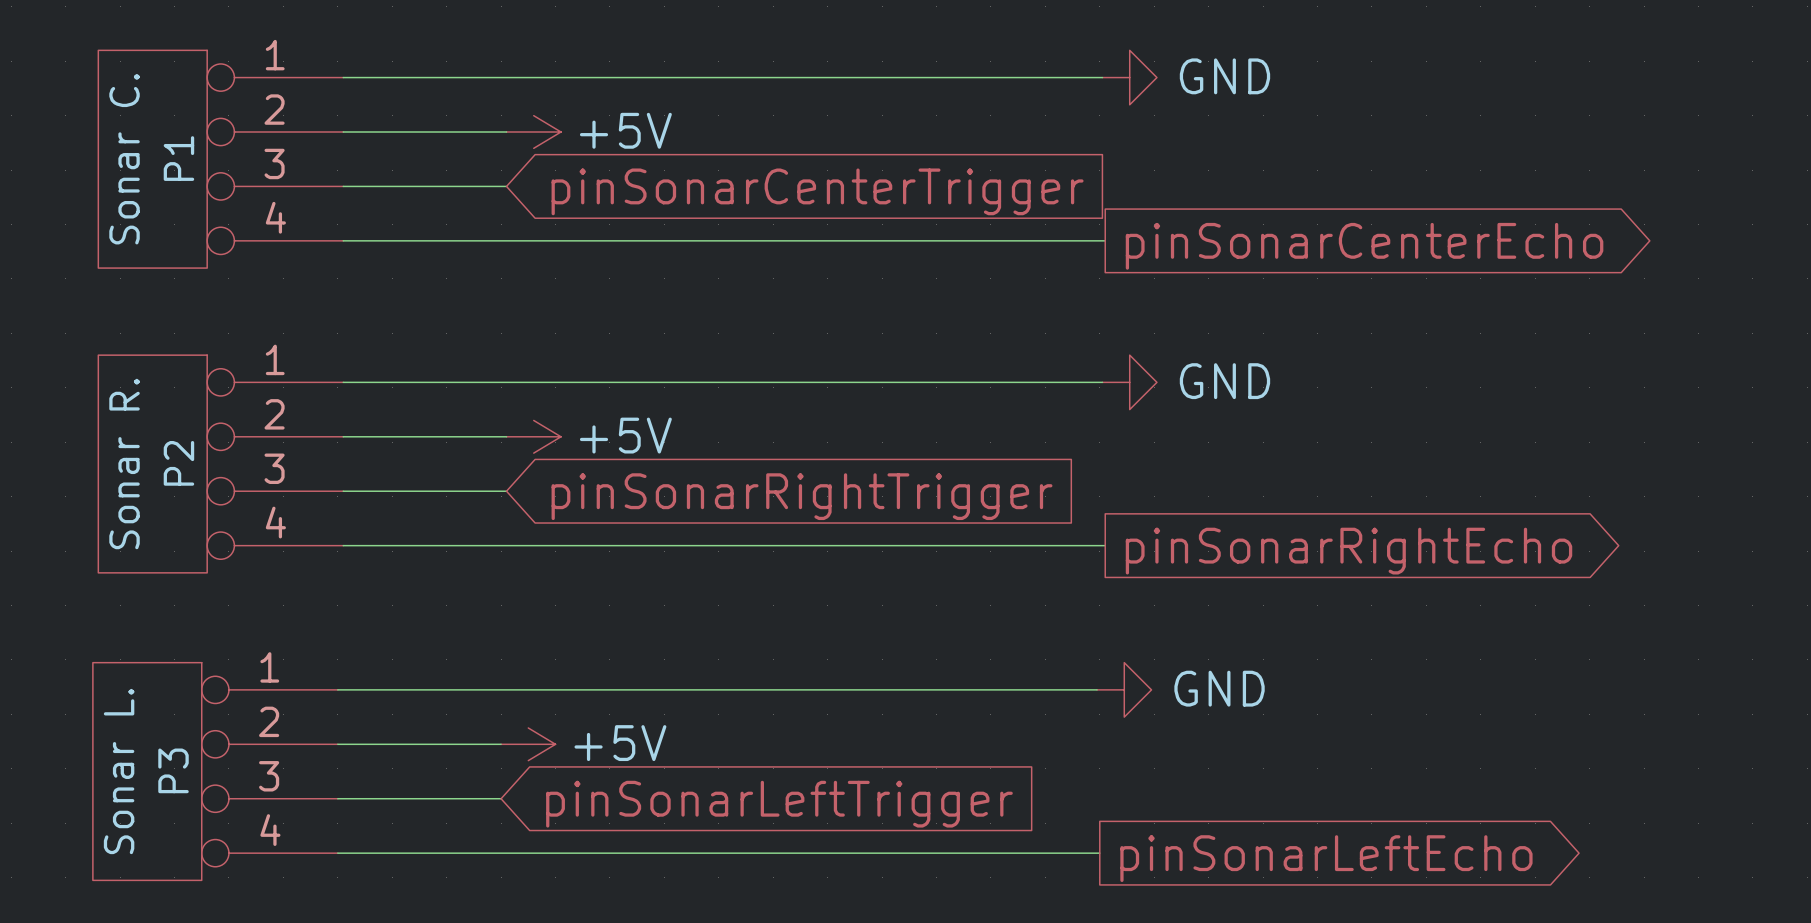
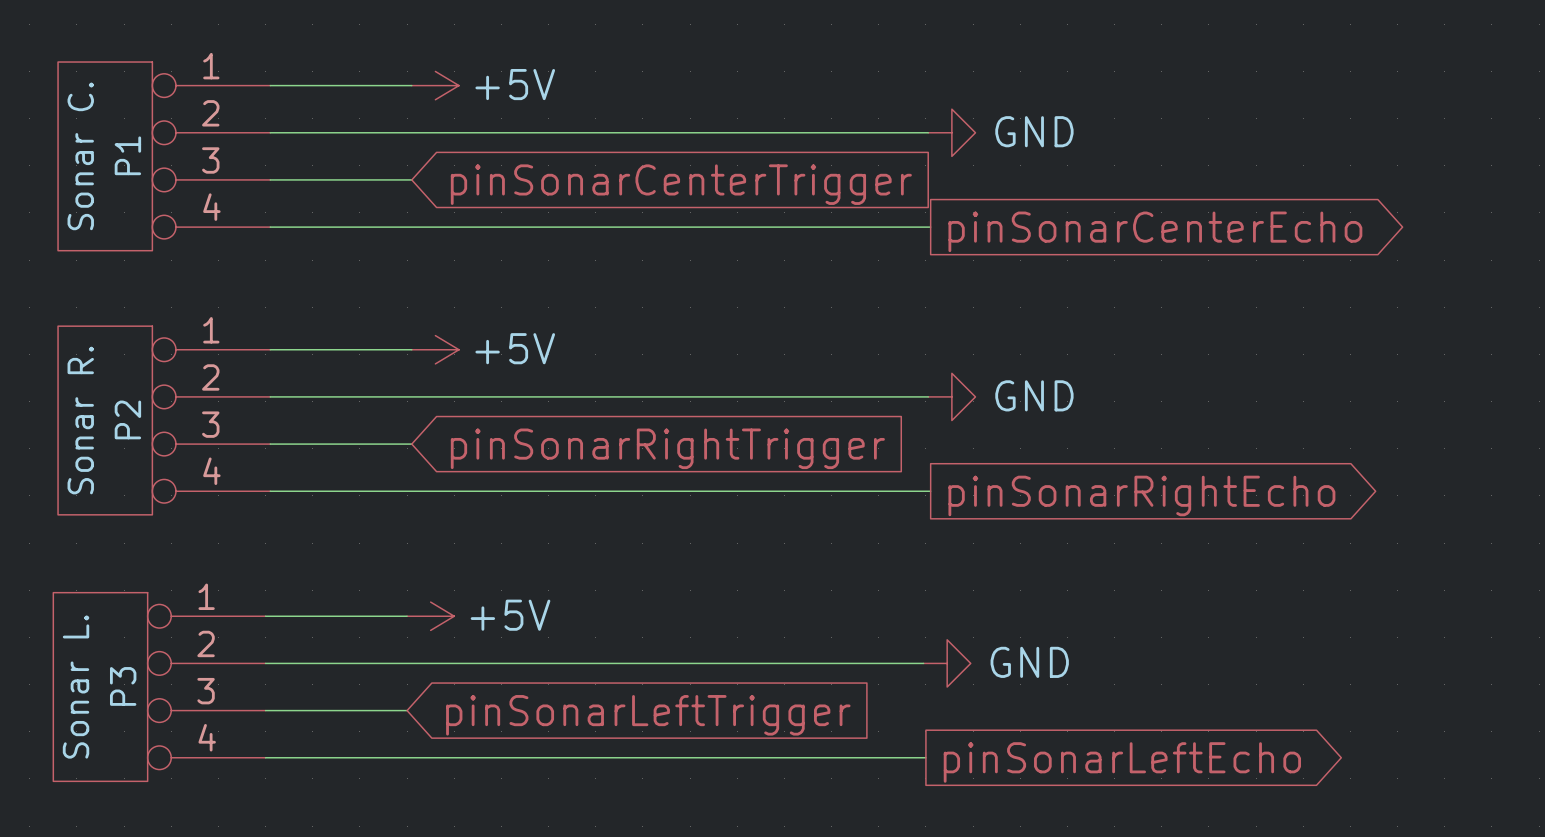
wire: (506, 77) (1102, 77) -> (411, 132) (928, 132)
power symbol position: GND (1129, 77) -> GND (951, 132)
power symbol position: +5V (533, 132) -> +5V (435, 85)
wire: (506, 382) (1102, 382) -> (411, 396) (928, 396)
power symbol position: GND (1129, 382) -> GND (951, 396)
power symbol position: +5V (533, 436) -> +5V (435, 349)
wire: (501, 689) (1097, 689) -> (407, 663) (923, 663)
power symbol position: GND (1124, 689) -> GND (947, 663)
power symbol position: +5V (528, 744) -> +5V (430, 616)

